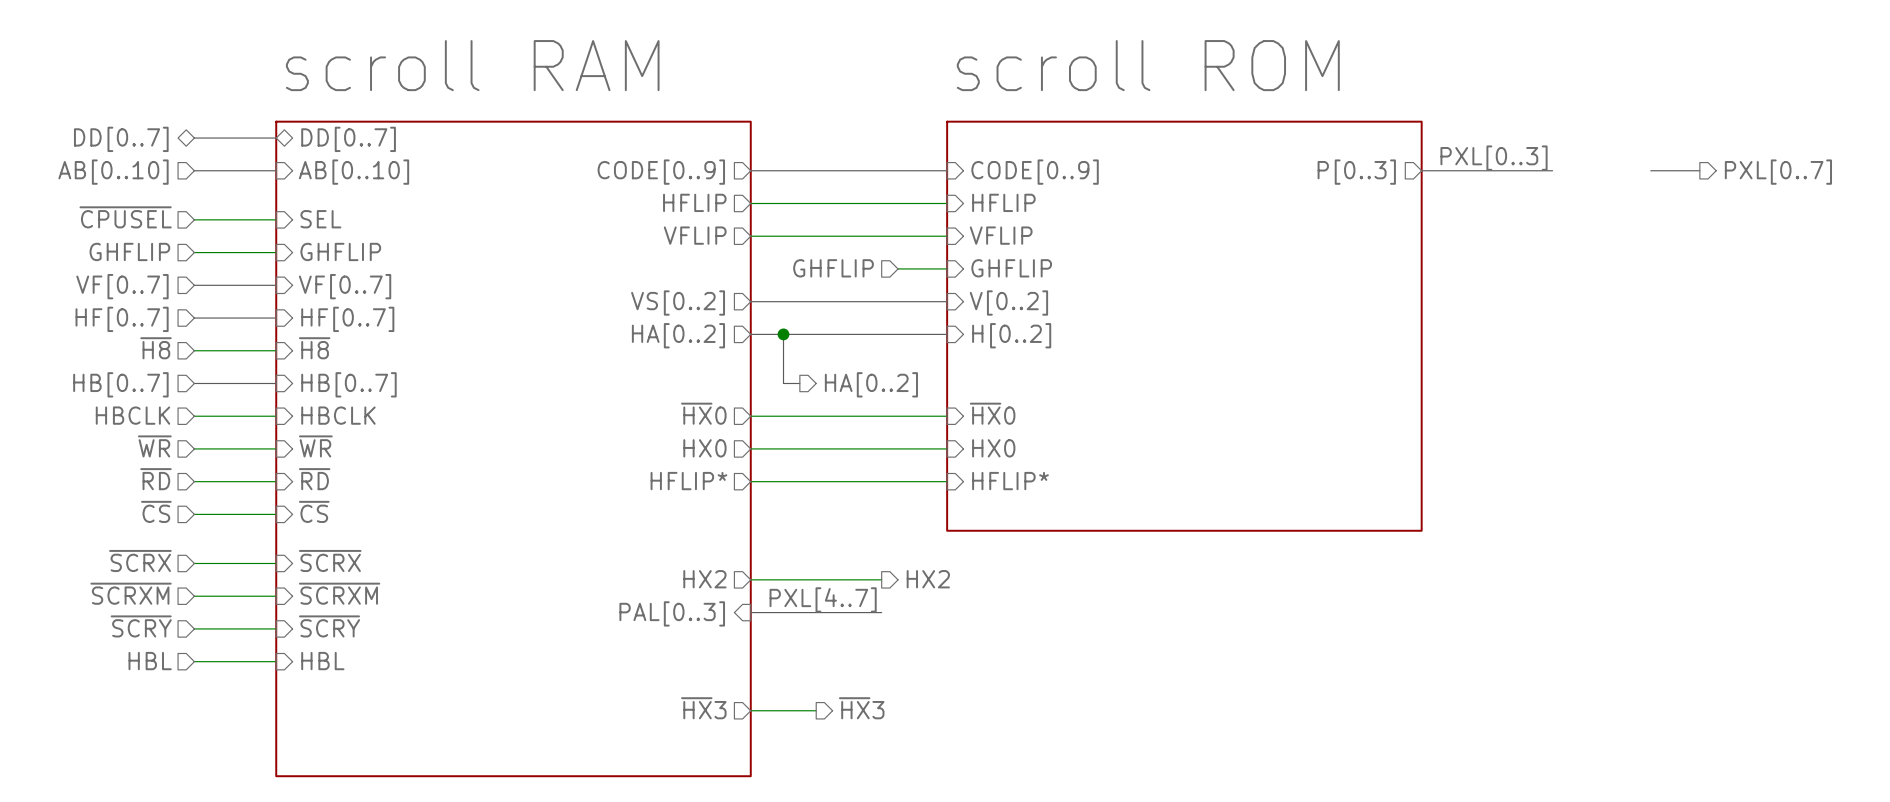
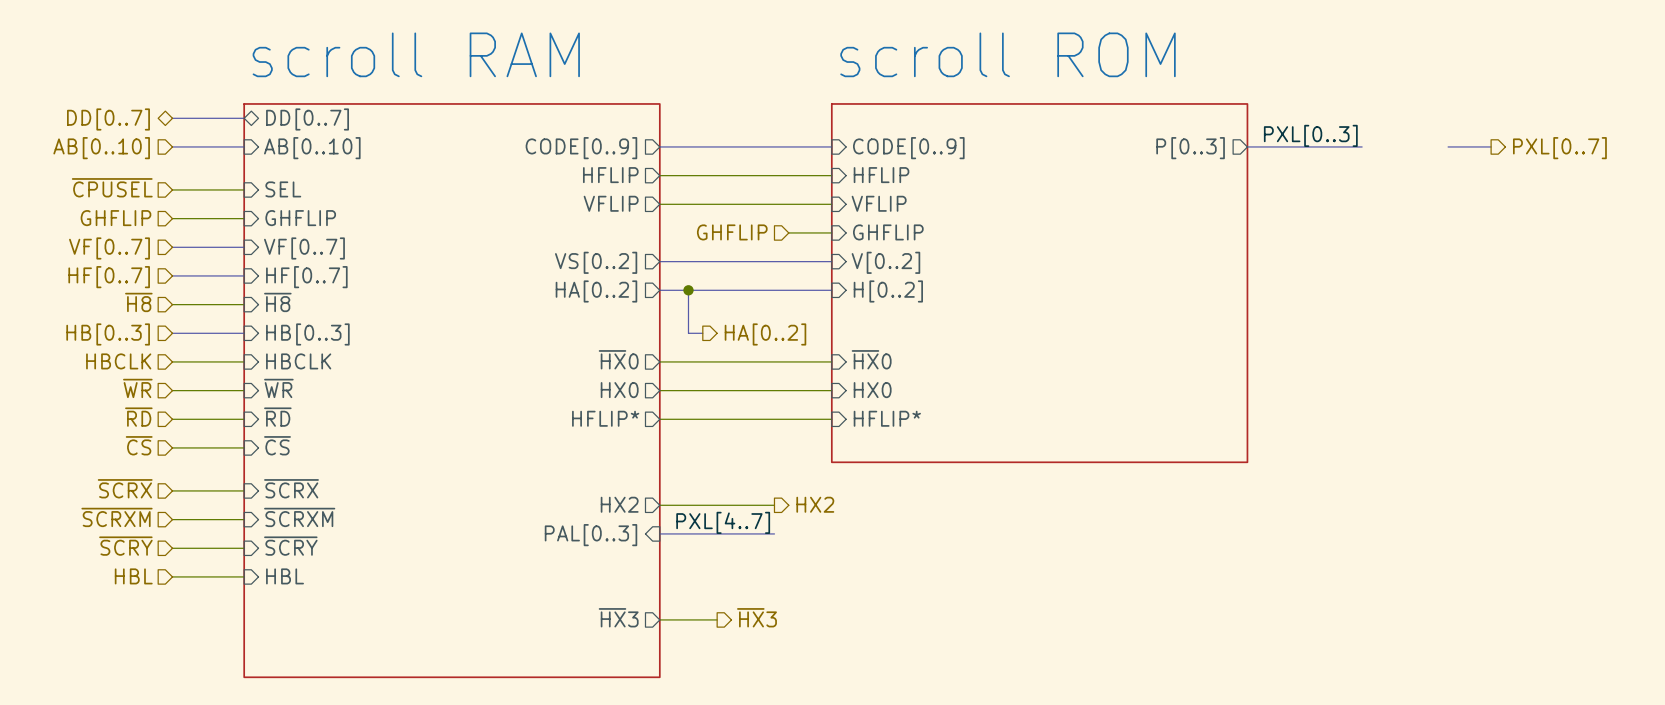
hierarchical label: HB[0..7] (120, 384) -> HB[0..3] (108, 334)
sheet pin: HB[0..7] (348, 384) -> HB[0..3] (307, 334)

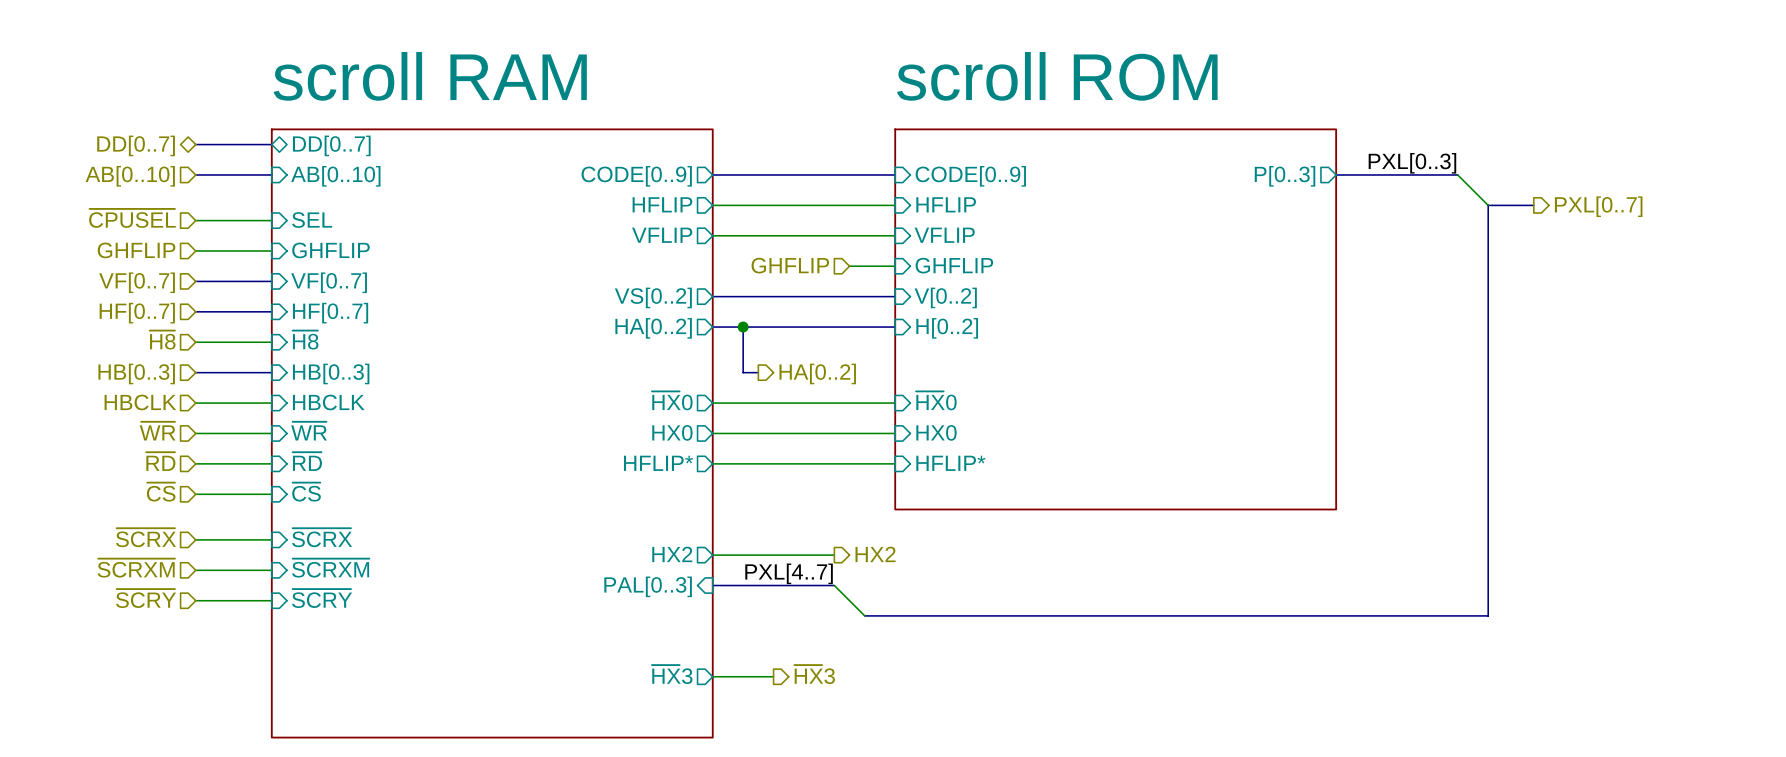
wire: none -> (1457, 174) (1488, 205)
bus: (1448, 146) (1491, 146) -> none
hierarchical label position: PXL[0..7] (1559, 148) -> PXL[0..7] (1598, 206)
bus: none -> (1533, 205) (1488, 205) (1488, 615) (864, 615)
wire: none -> (834, 585) (864, 615)
hierarchical label: HBL (133, 576) -> none
wire: (172, 576) (244, 576) -> none
sheet pin: HBL (285, 576) -> none

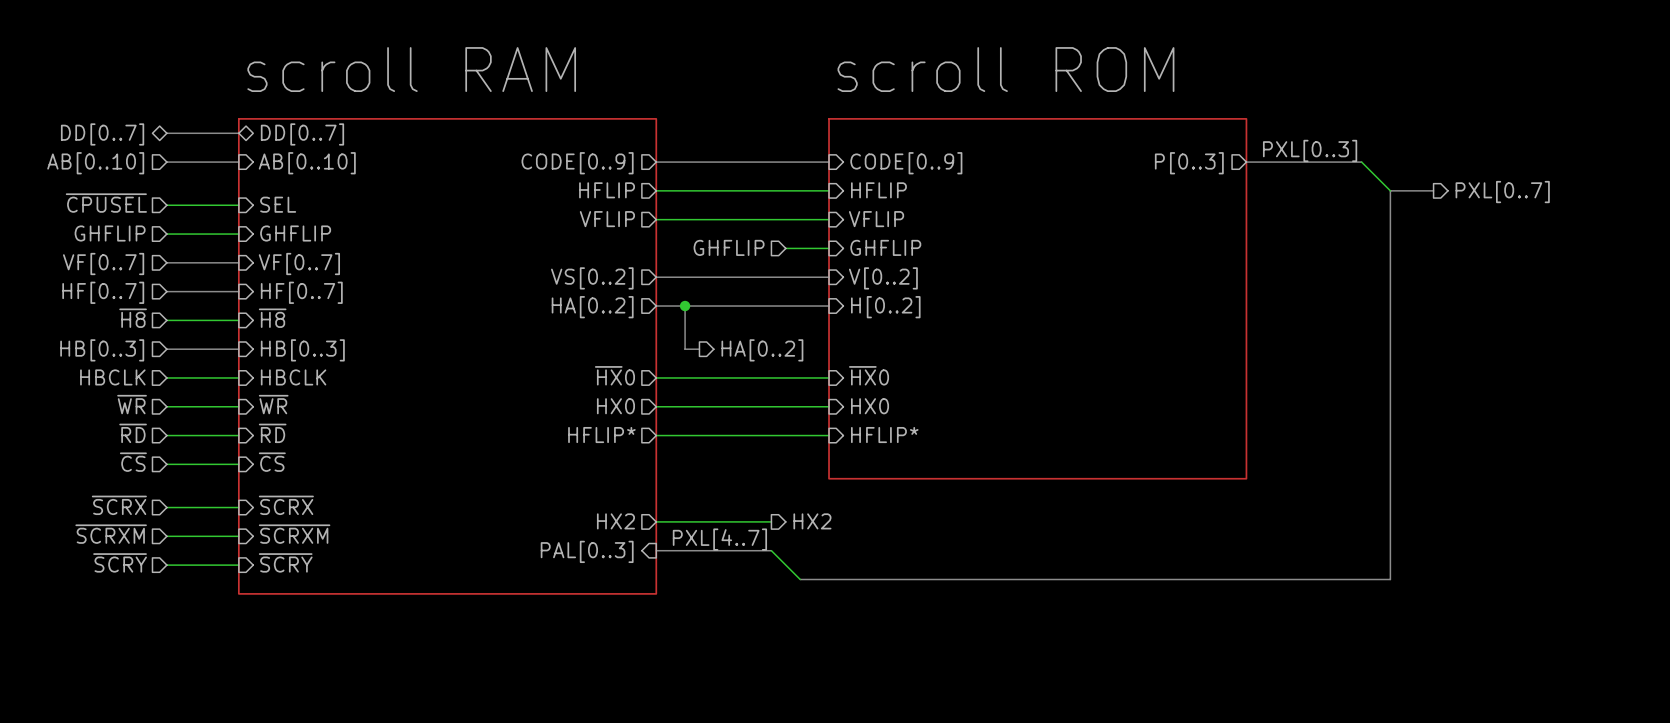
sheet scroll RAM: none -> (447, 356)
sheet scroll RAM: (492, 433) -> none
sheet pin: ~{HX}3 (672, 674) -> none
hierarchical label: ~{HX}3 (814, 674) -> none
wire: (712, 676) (773, 676) -> none

